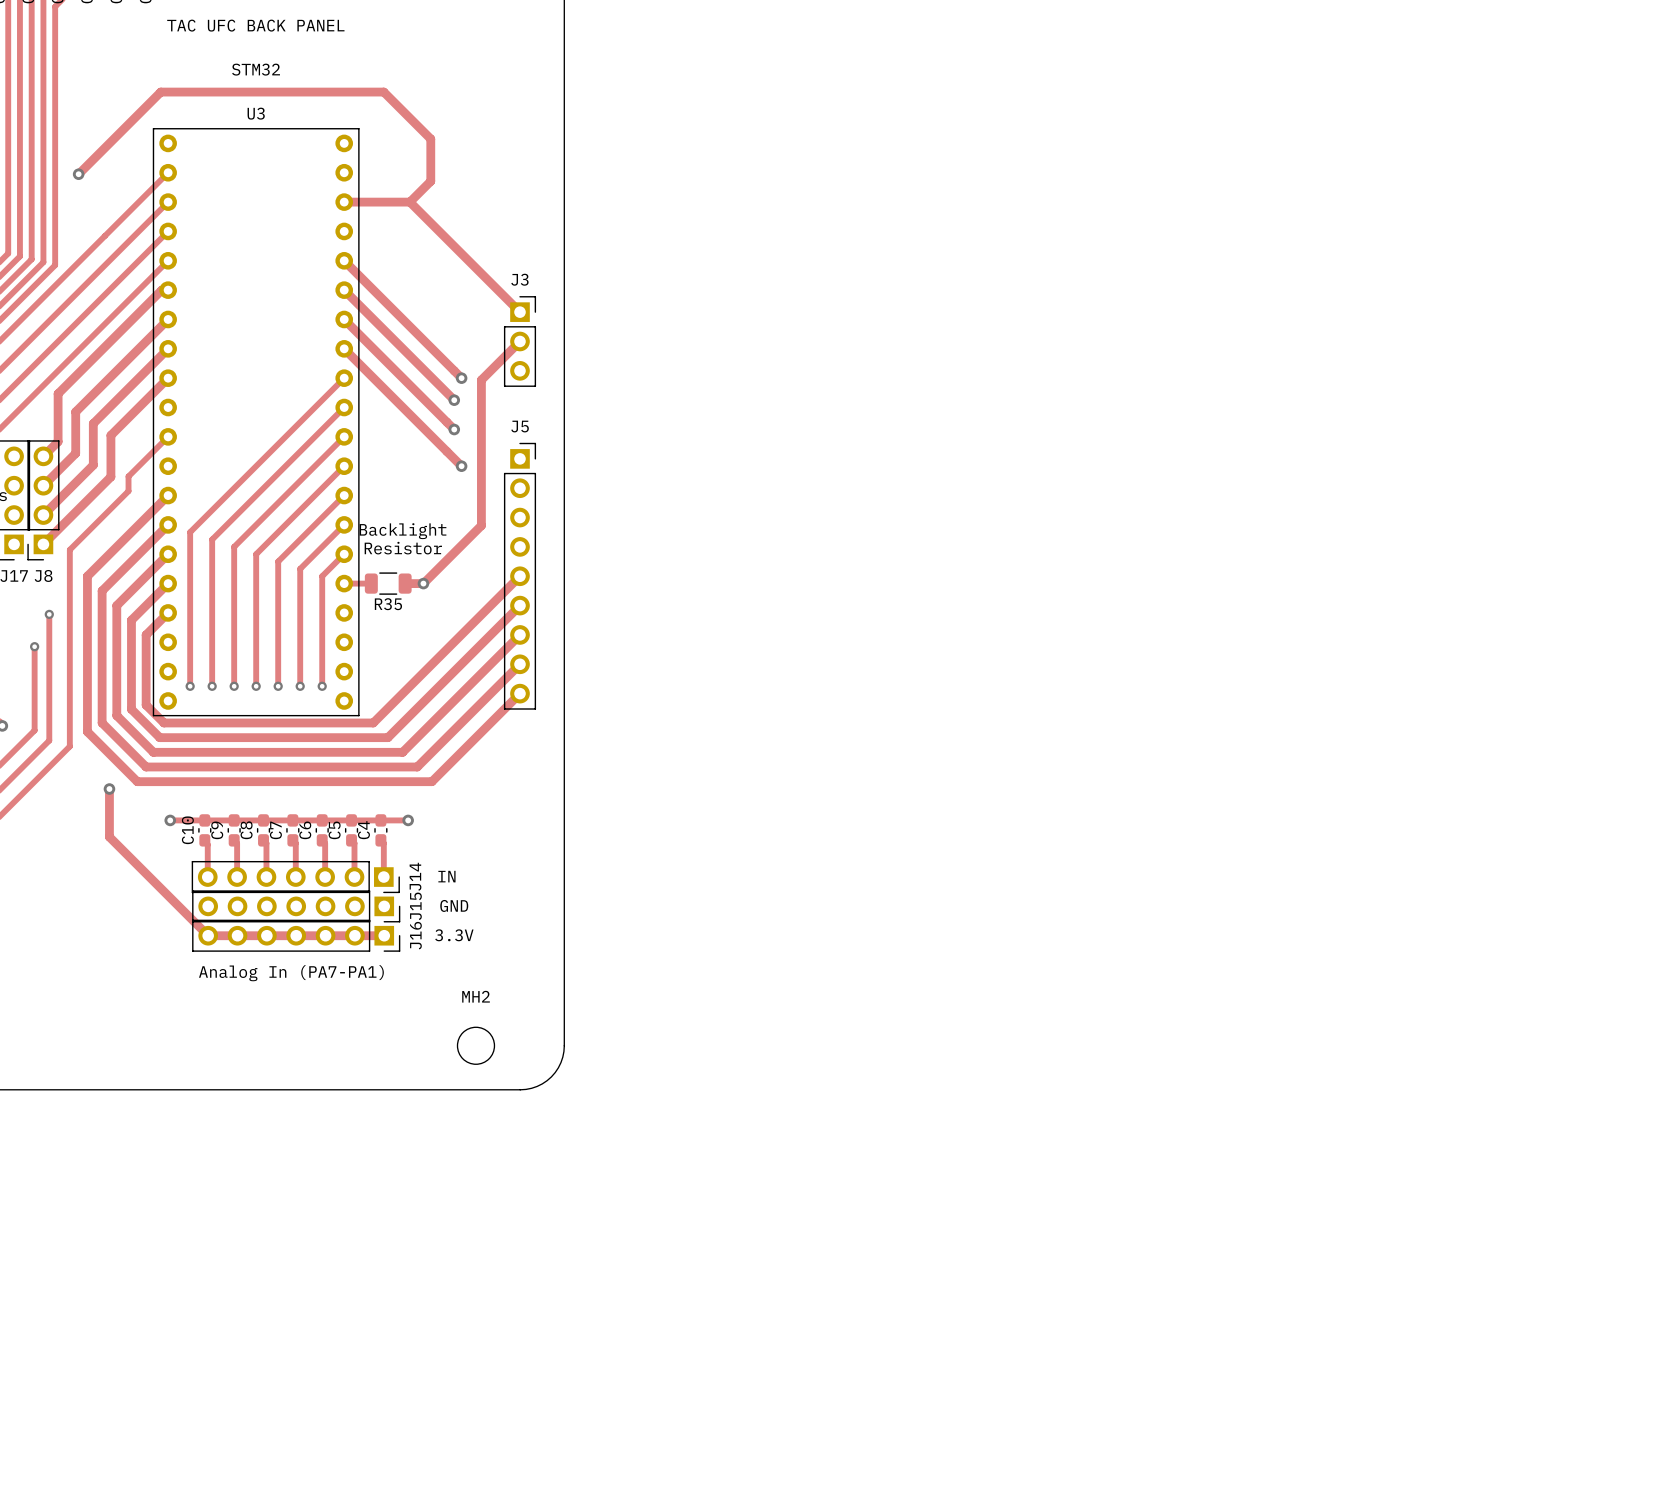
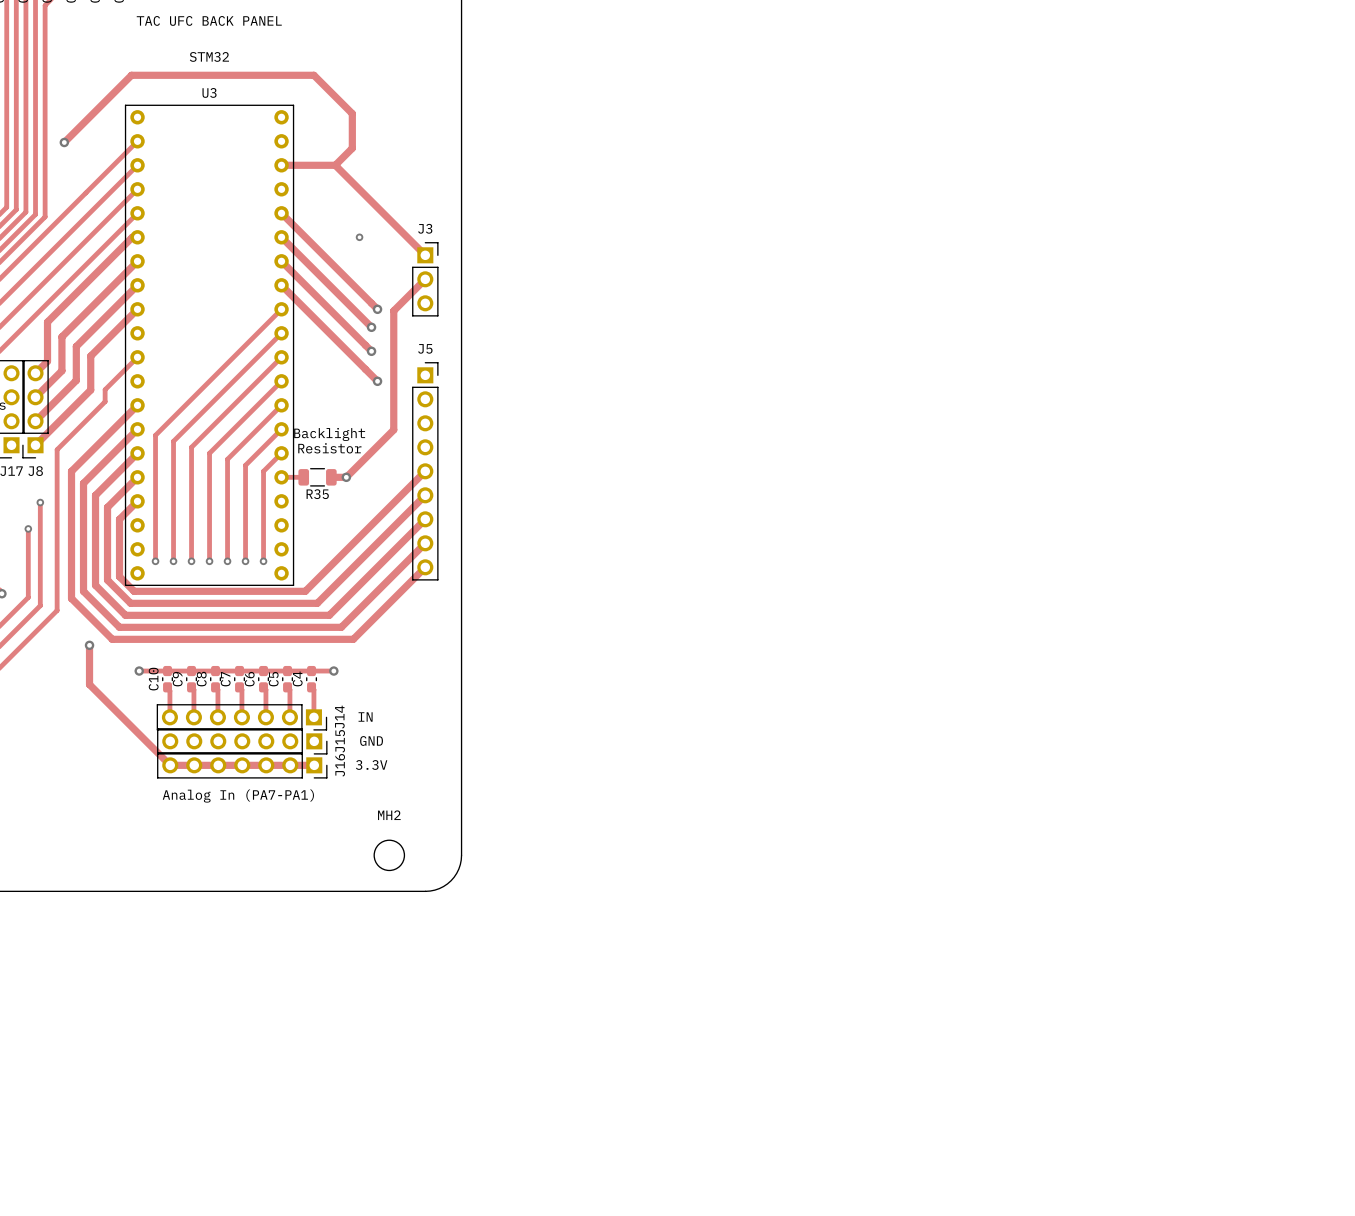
via: none -> (359, 237)

